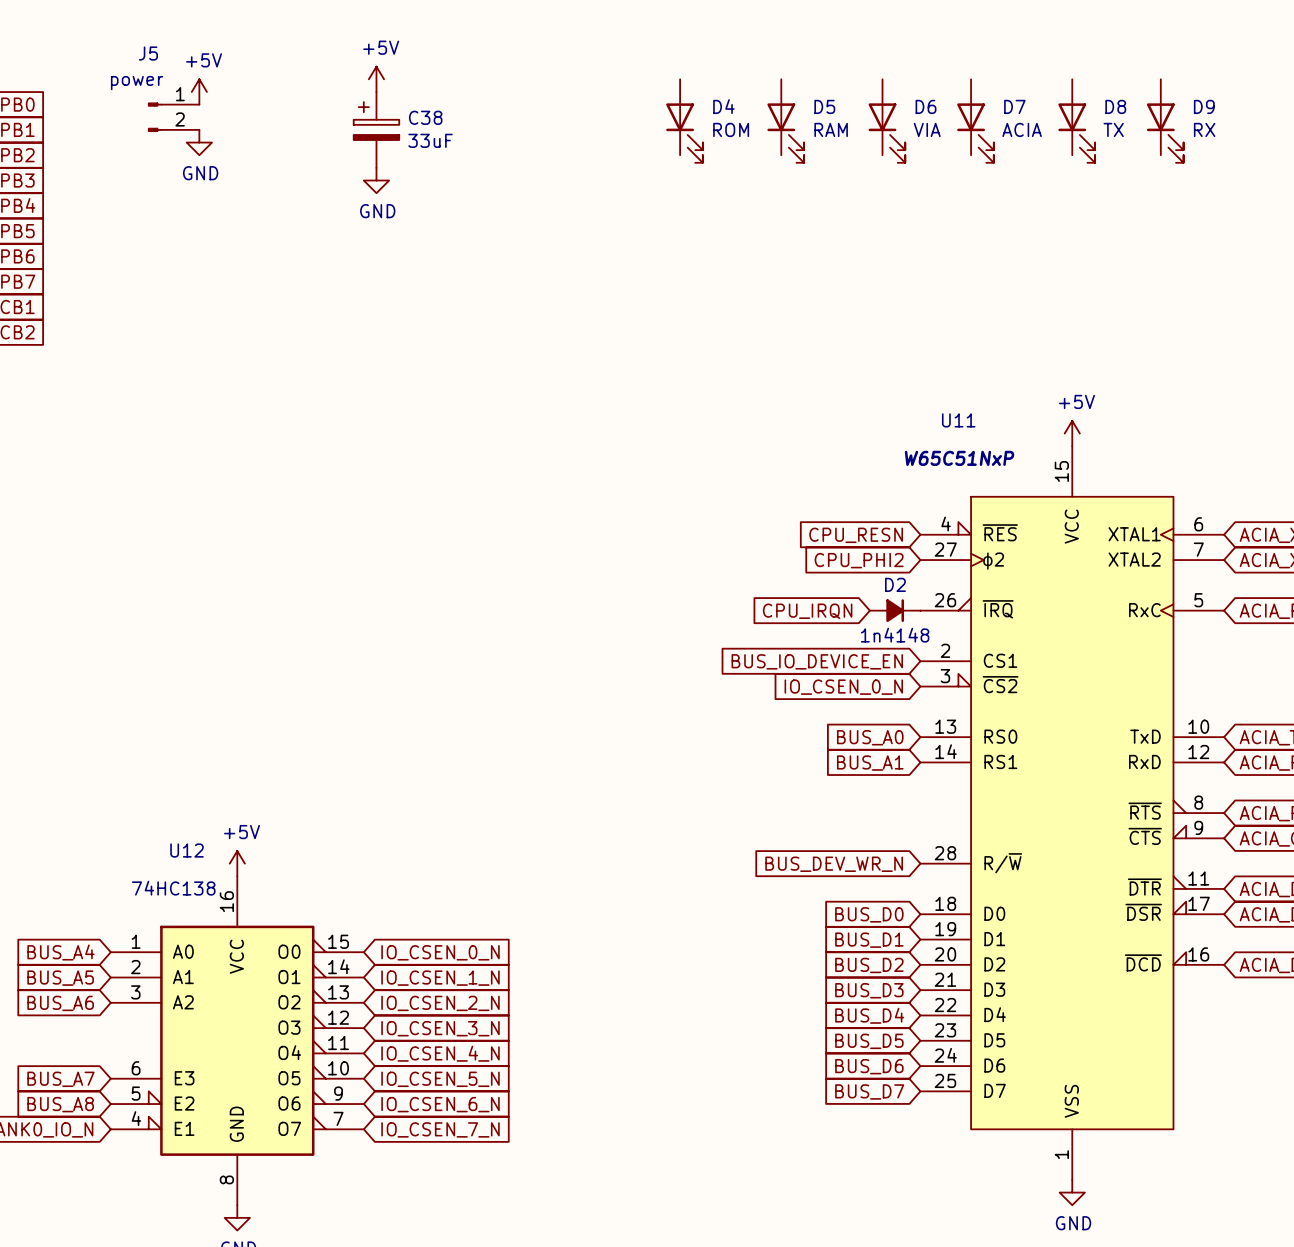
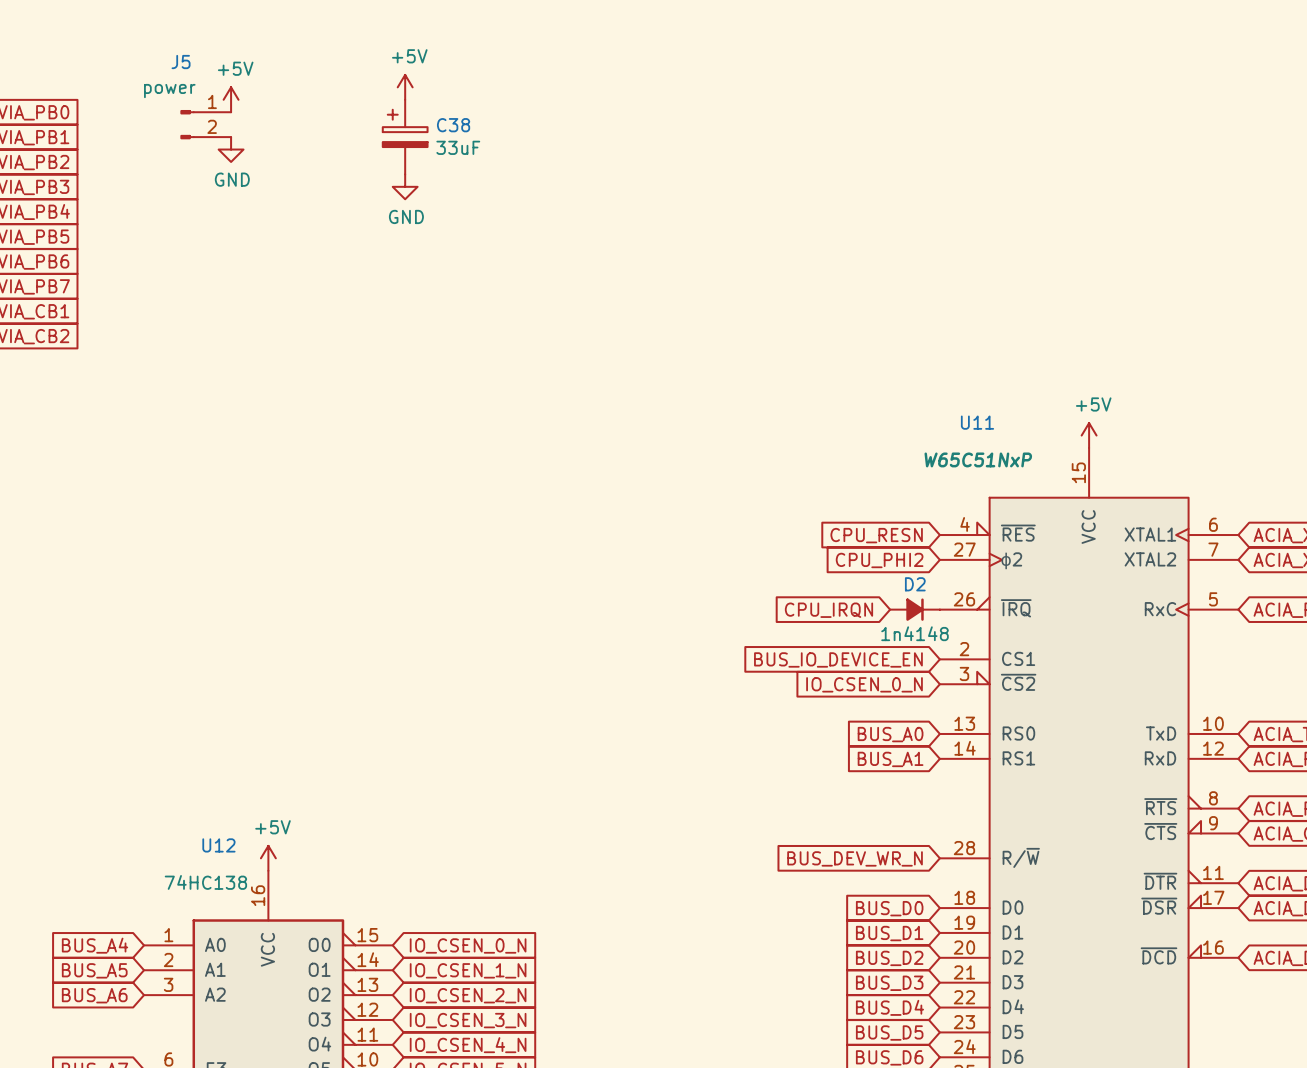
D4: ROM (684, 121) -> none
D5: RAM (785, 121) -> none
D6: VIA (886, 121) -> none
D7: ACIA (975, 121) -> none
D8: TX (1076, 121) -> none
D9: RX (1165, 121) -> none

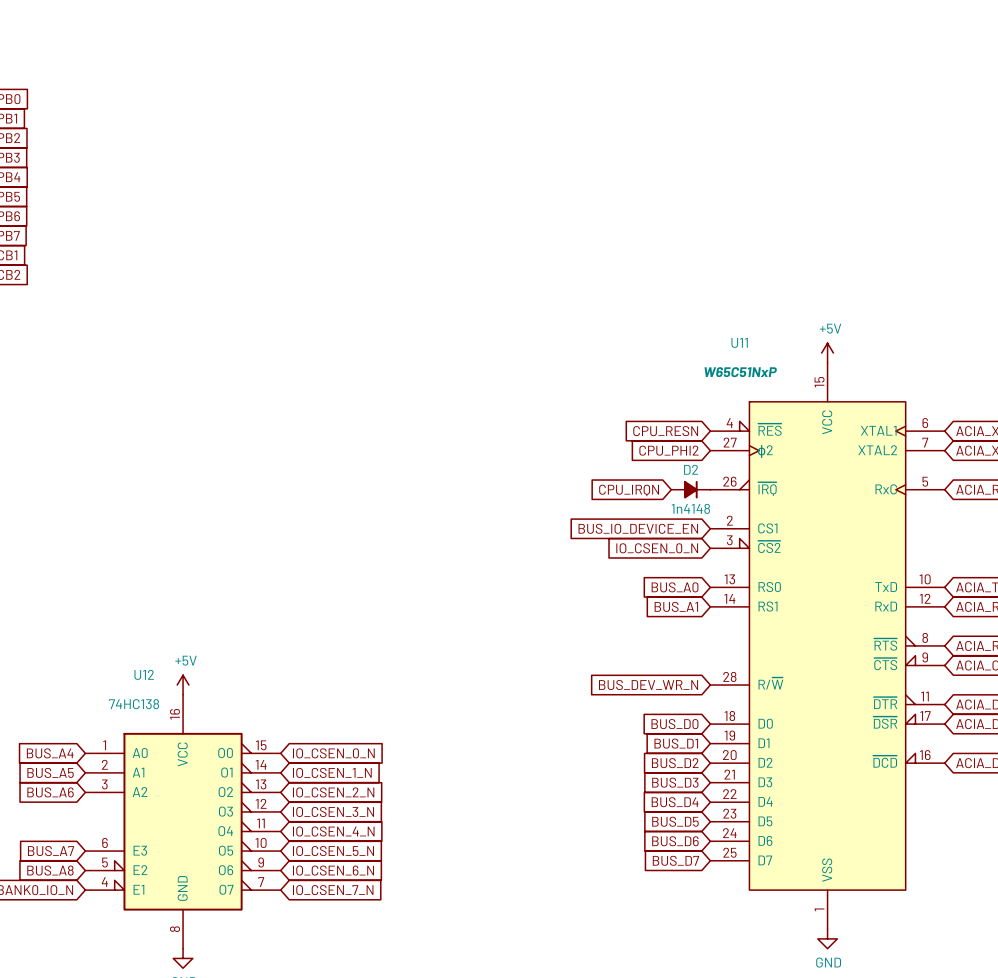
power symbol: +5V (405, 87) -> none
power symbol: +5V (231, 99) -> none
J5: power (205, 124) -> none
C38: 33uF (405, 137) -> none
power symbol: GND (231, 149) -> none
power symbol: GND (405, 186) -> none

